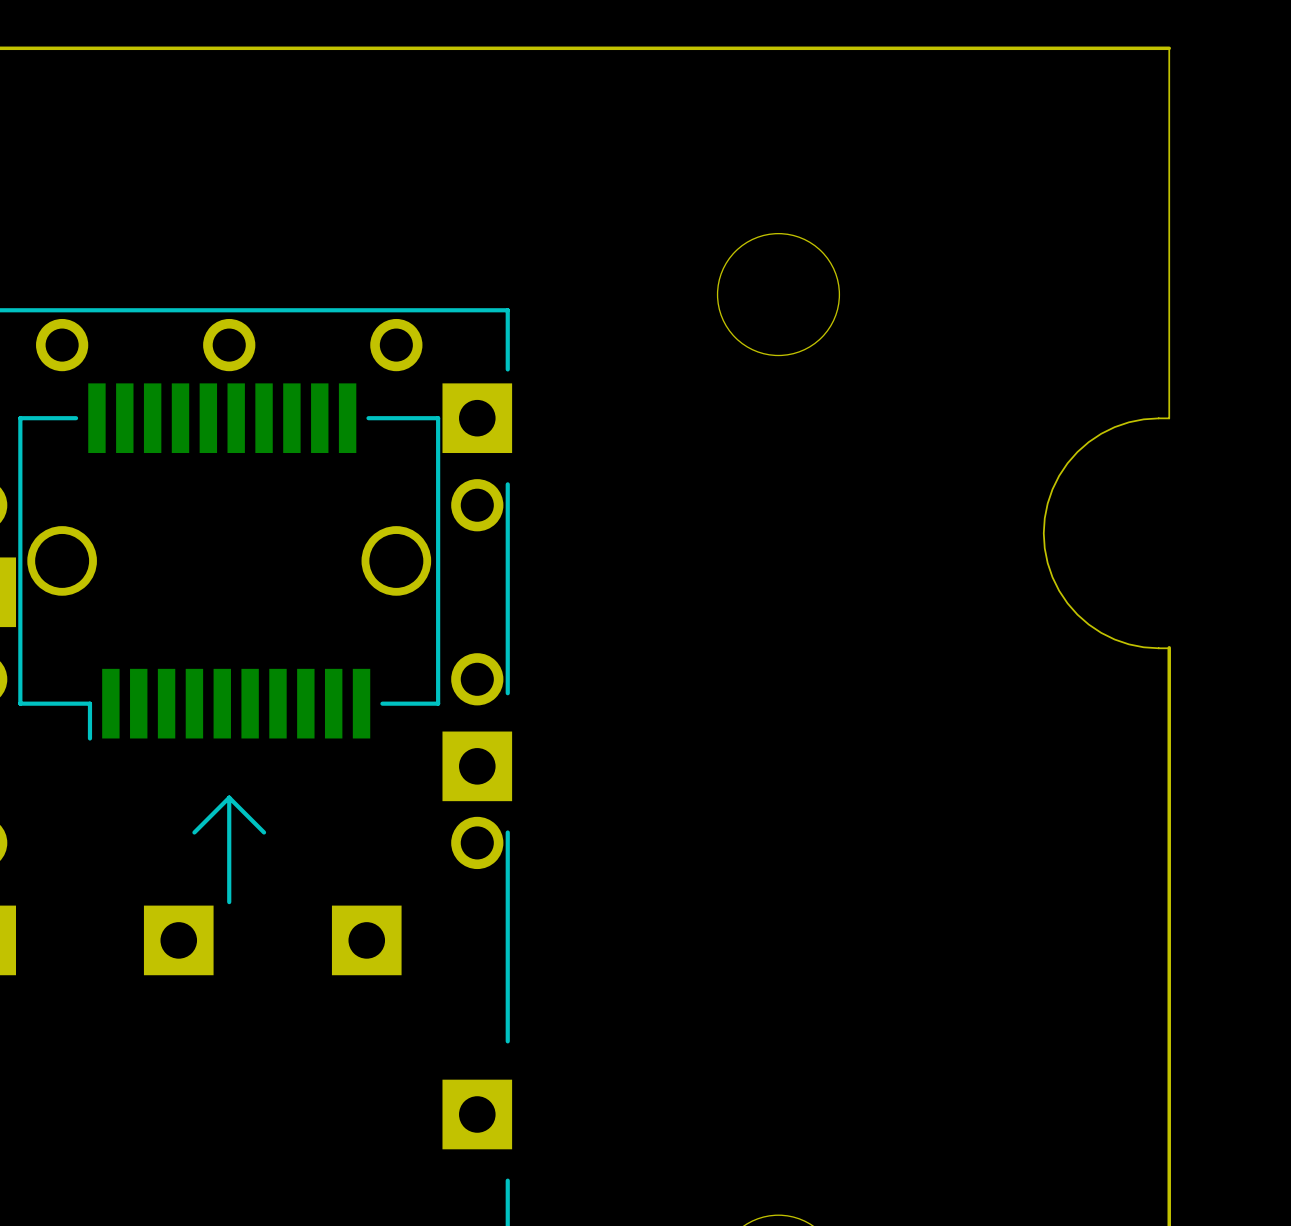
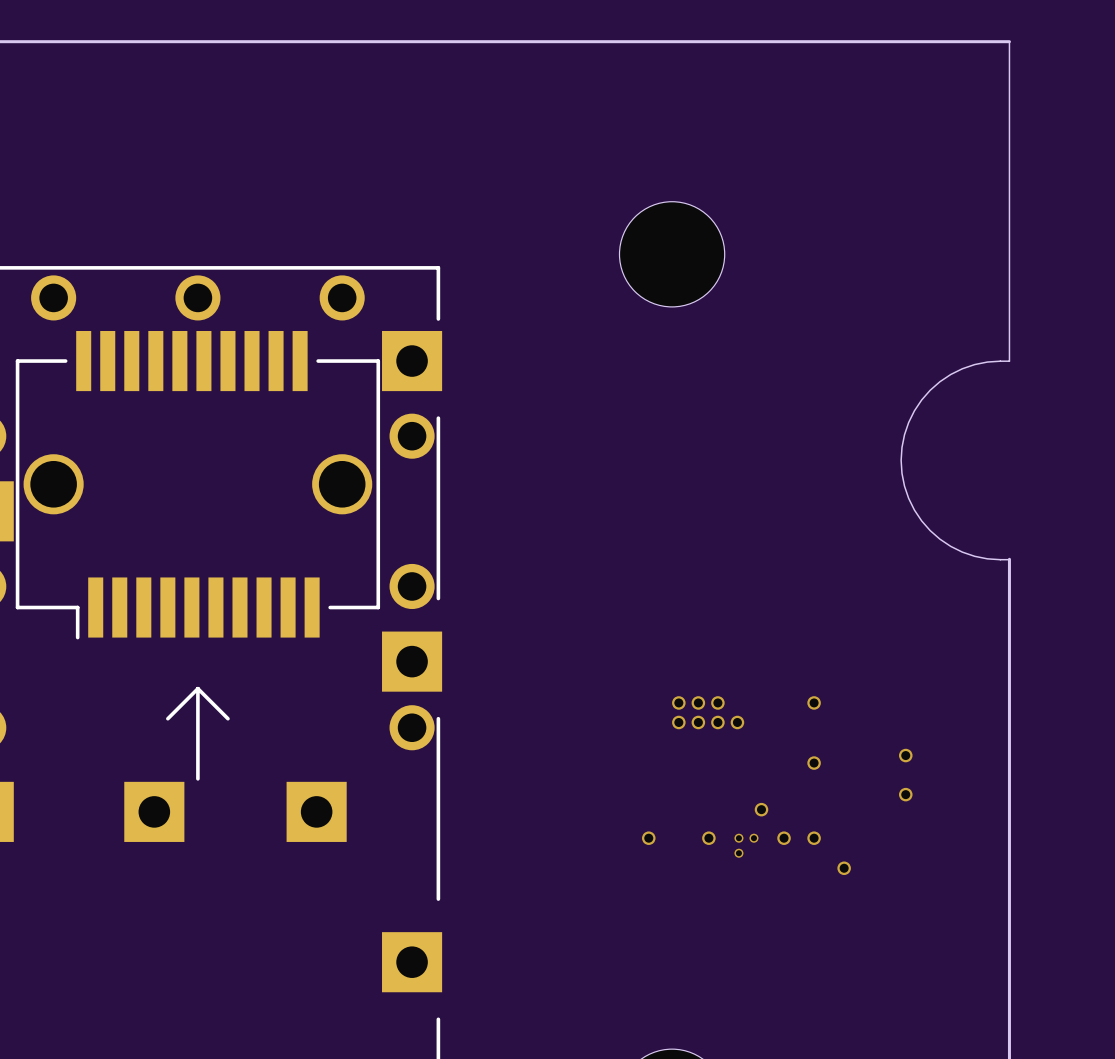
via: none -> (678, 702)
via: none -> (698, 702)
via: none -> (717, 702)
via: none -> (814, 702)
via: none -> (678, 722)
via: none -> (698, 722)
via: none -> (717, 722)
via: none -> (737, 722)
via: none -> (905, 755)
via: none -> (814, 763)
via: none -> (905, 794)
via: none -> (761, 809)
via: none -> (648, 838)
via: none -> (708, 838)
via: none -> (738, 838)
via: none -> (753, 838)
via: none -> (784, 838)
via: none -> (814, 838)
via: none -> (738, 853)
via: none -> (844, 868)

